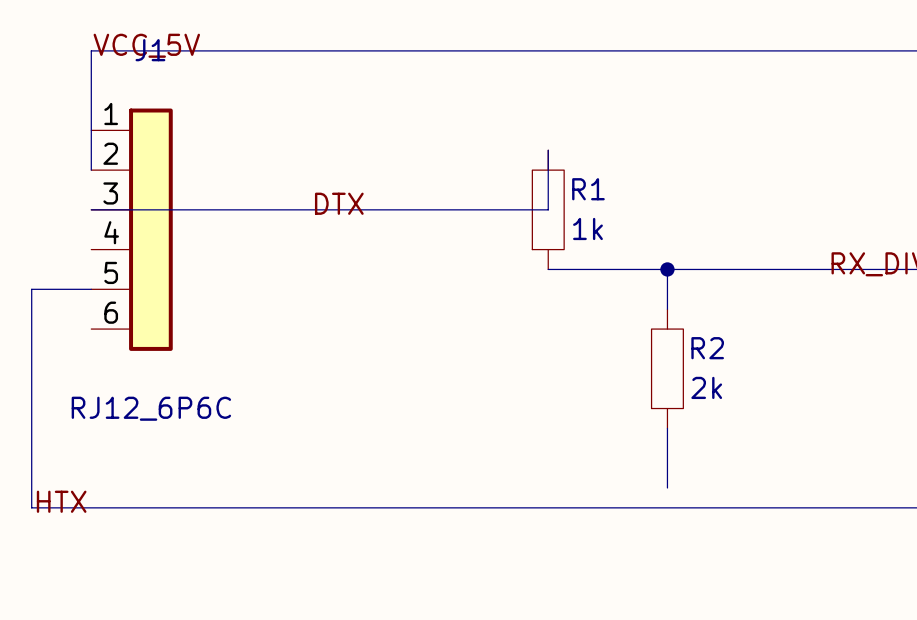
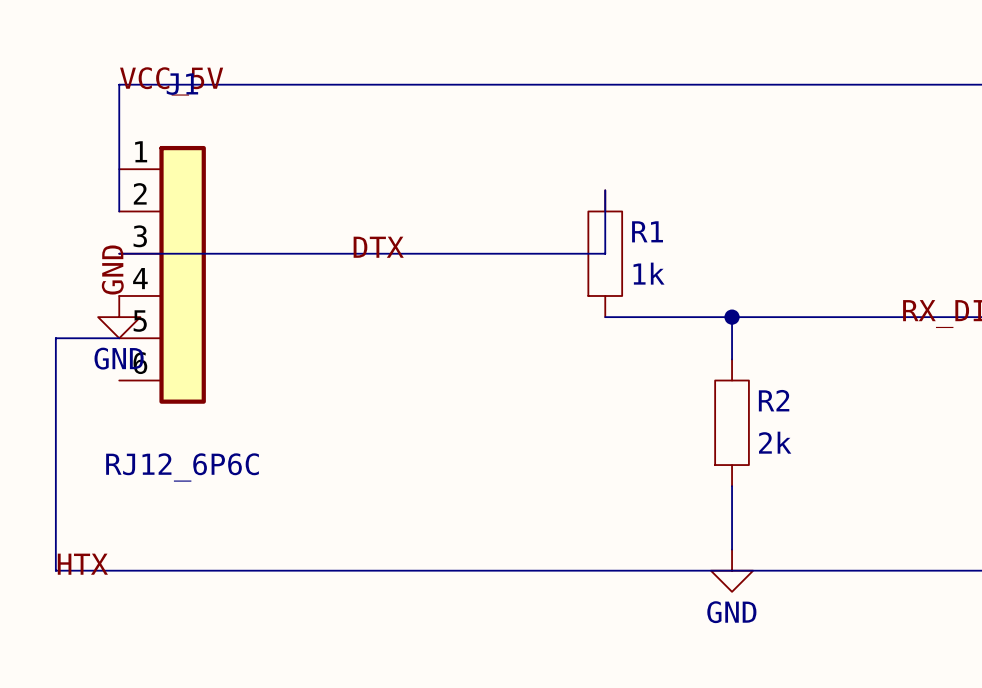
label: none -> GND (112, 270)
power symbol: none -> GND (119, 317)
power symbol: none -> GND (732, 570)

